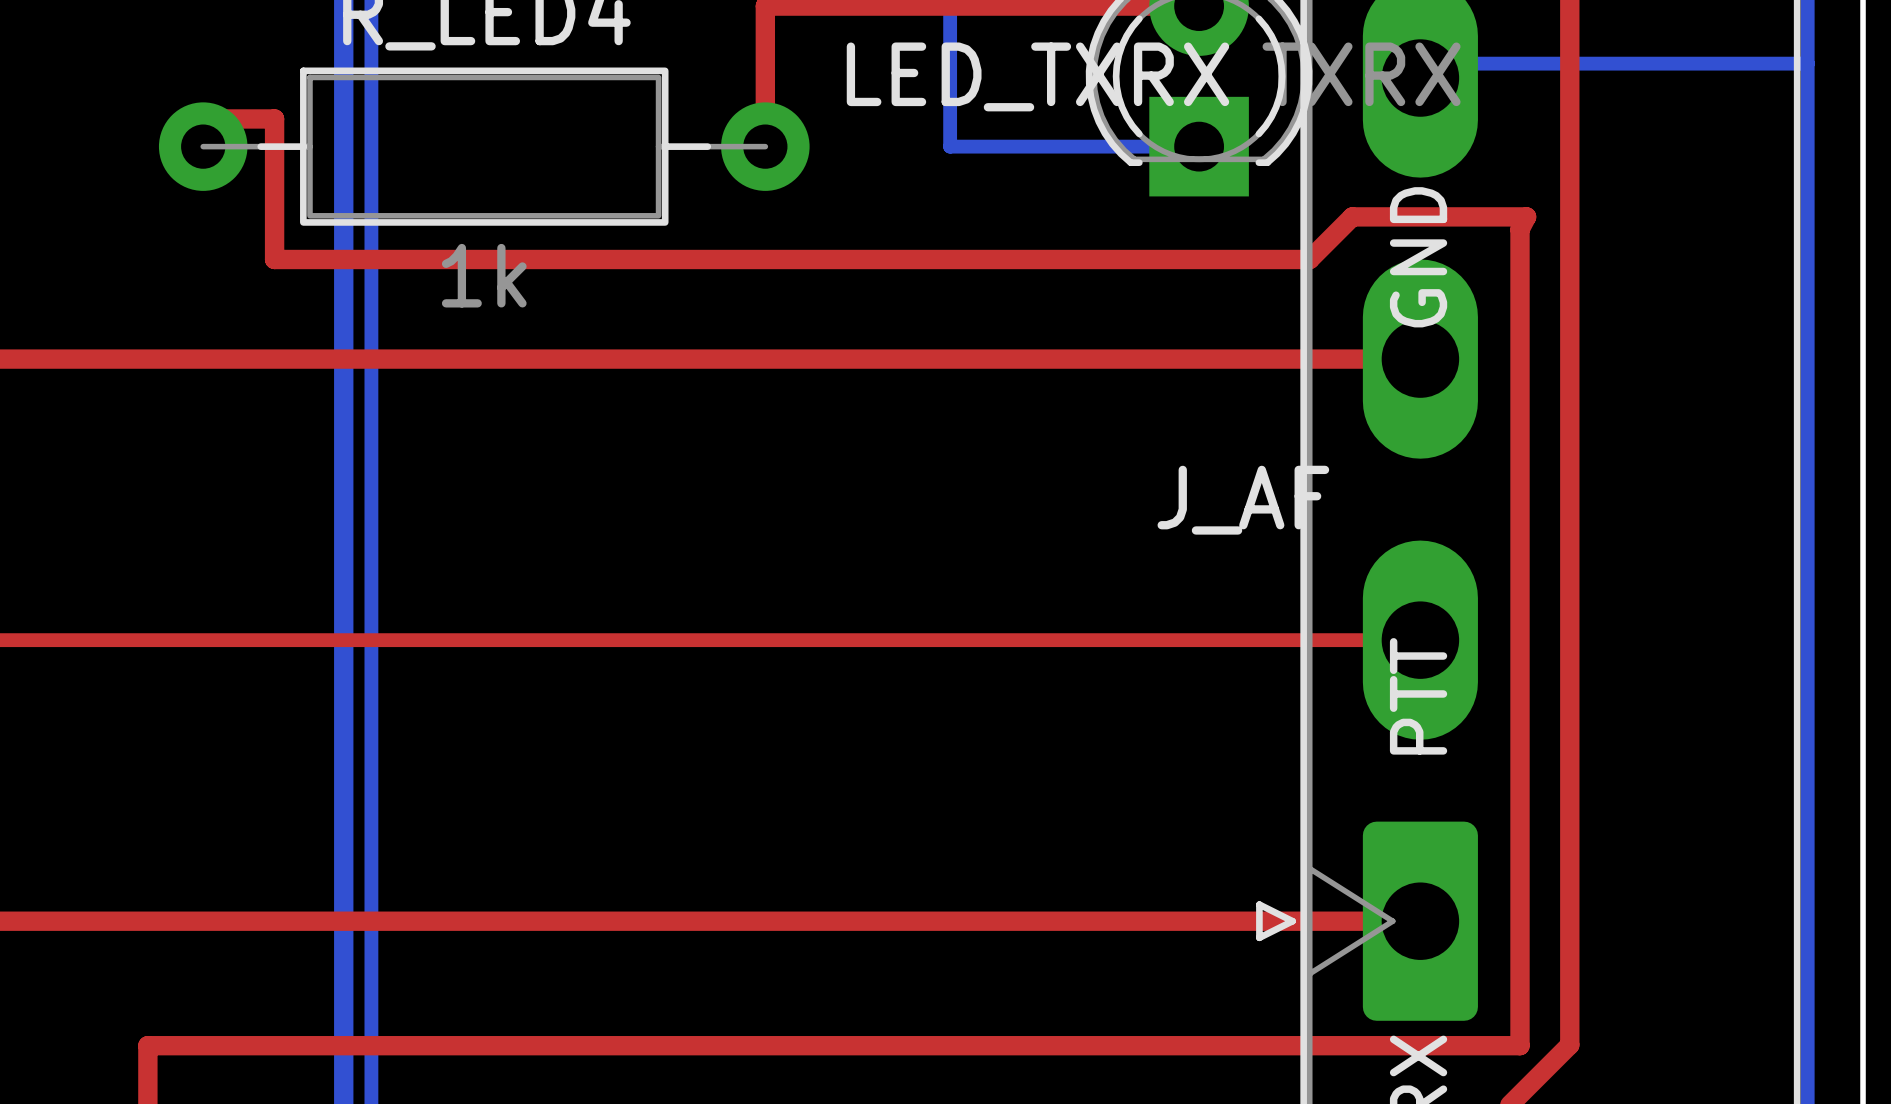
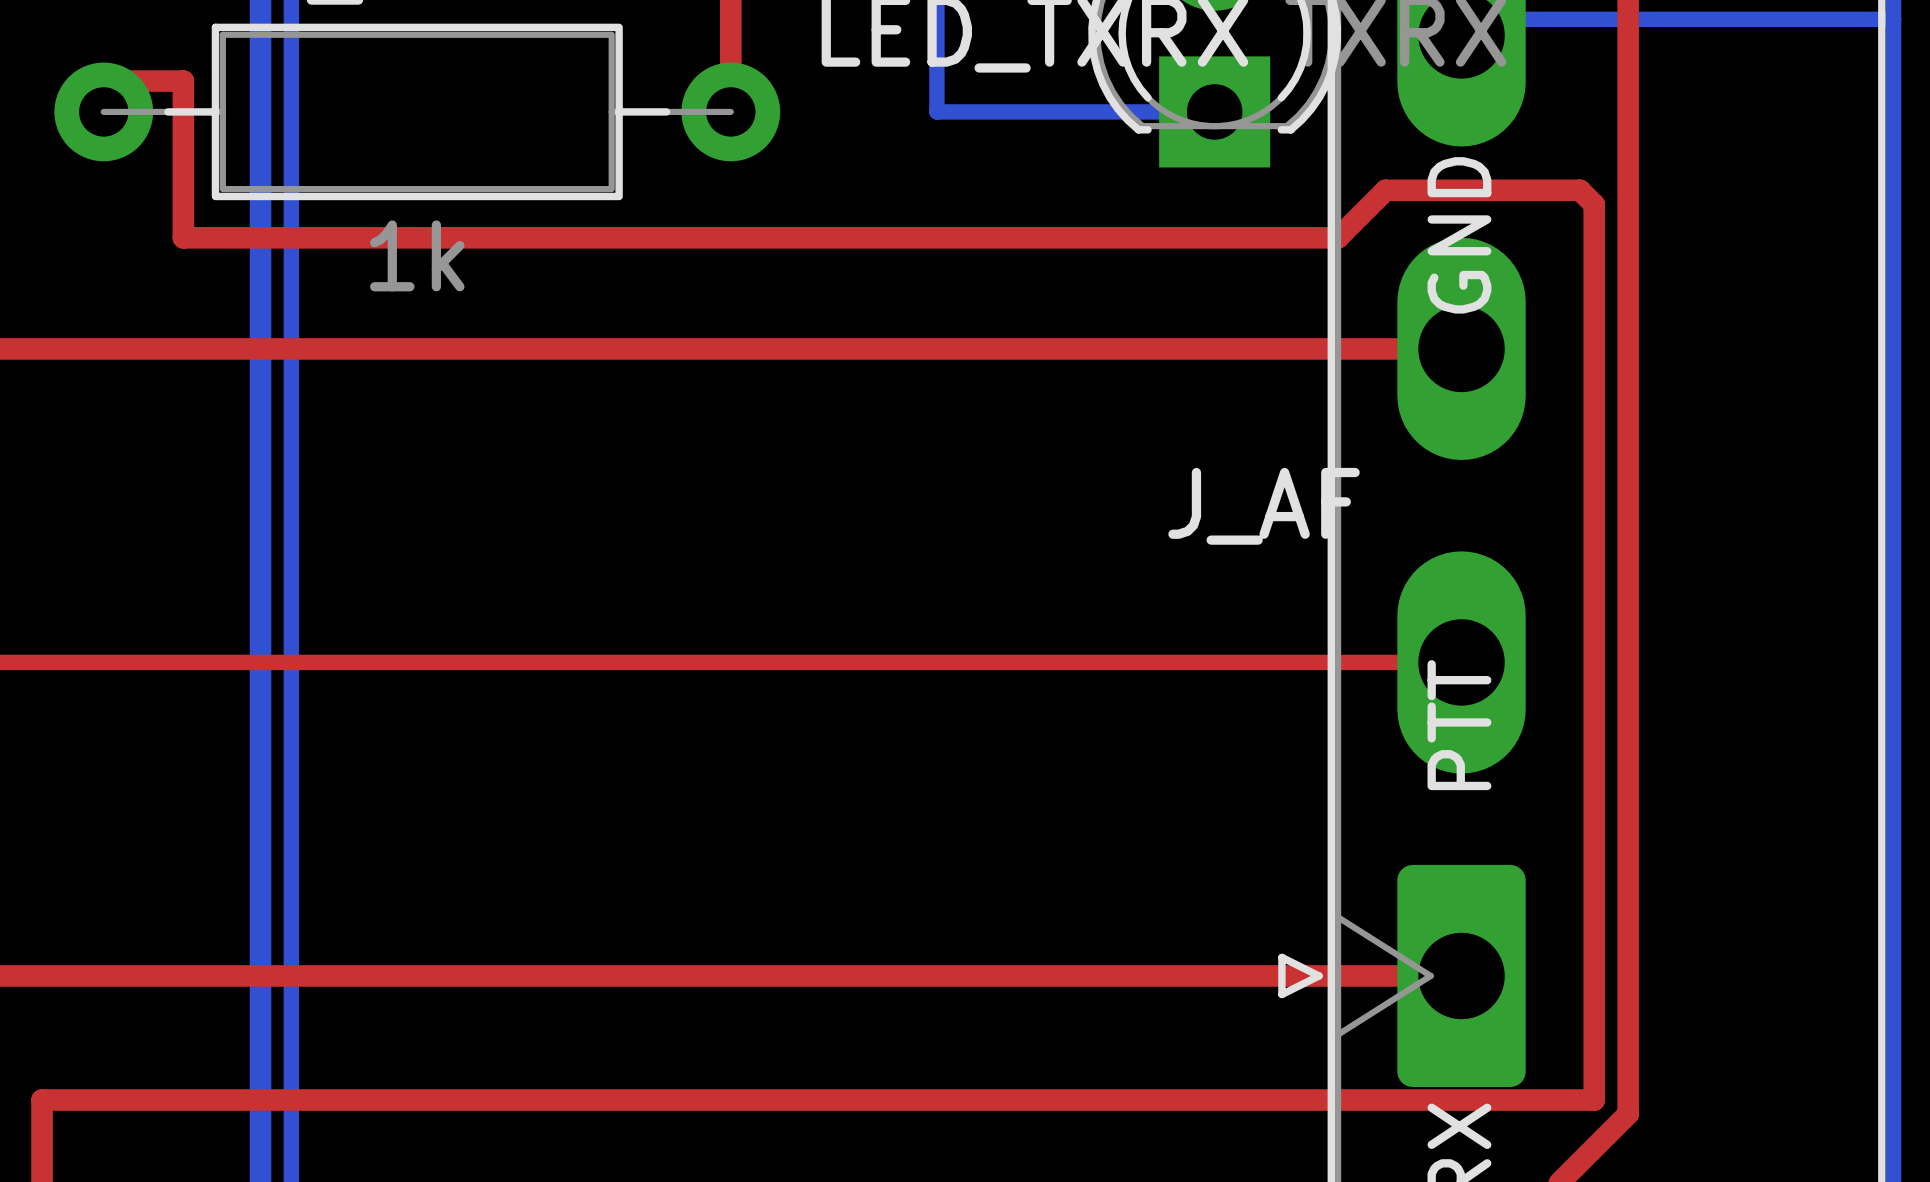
top track: (1526, 216) (1519, 229) (1519, 1045) (147, 1045) -> (1580, 190) (1594, 204) (1594, 1100) (42, 1100) (42, 1114)

